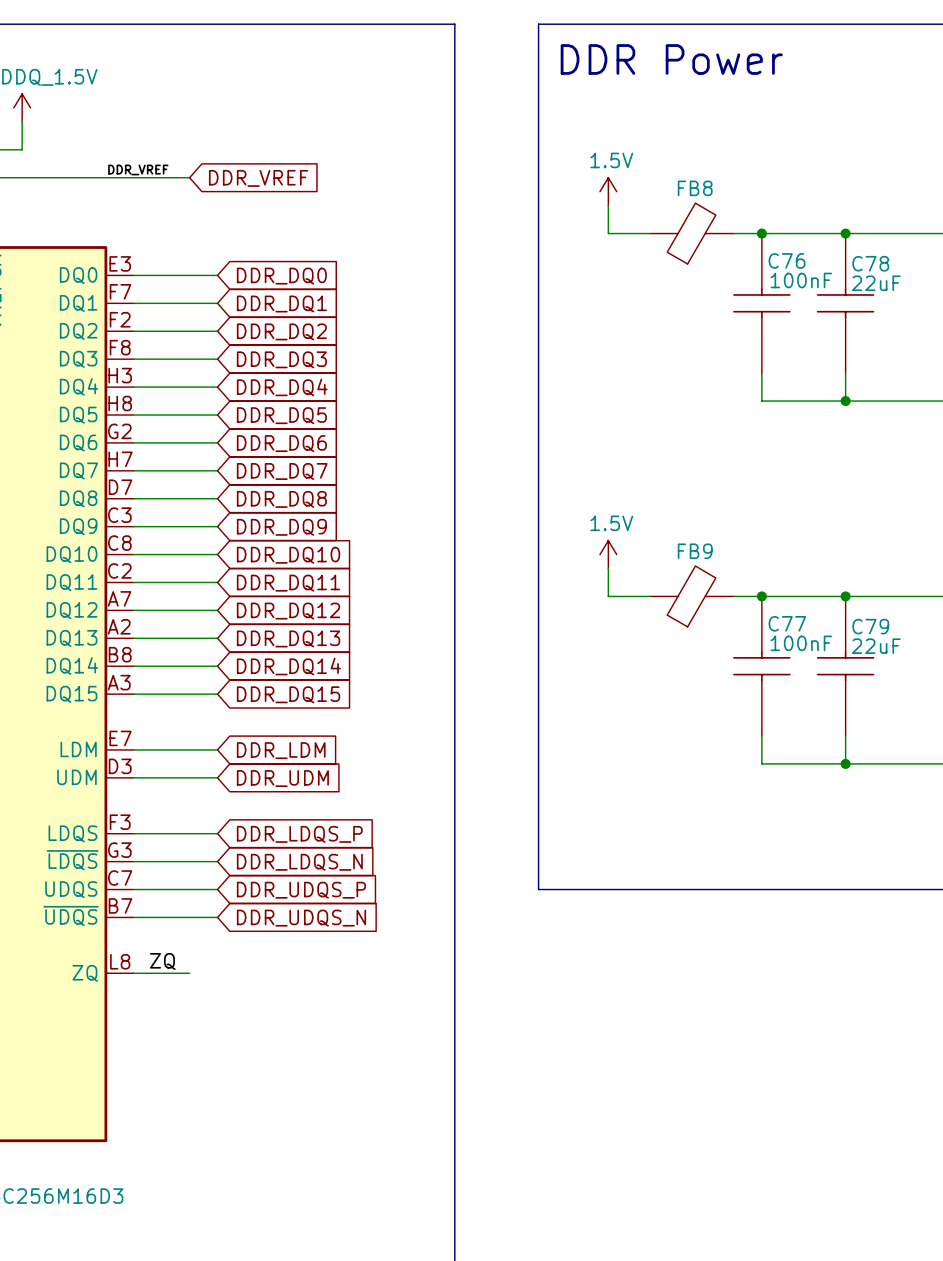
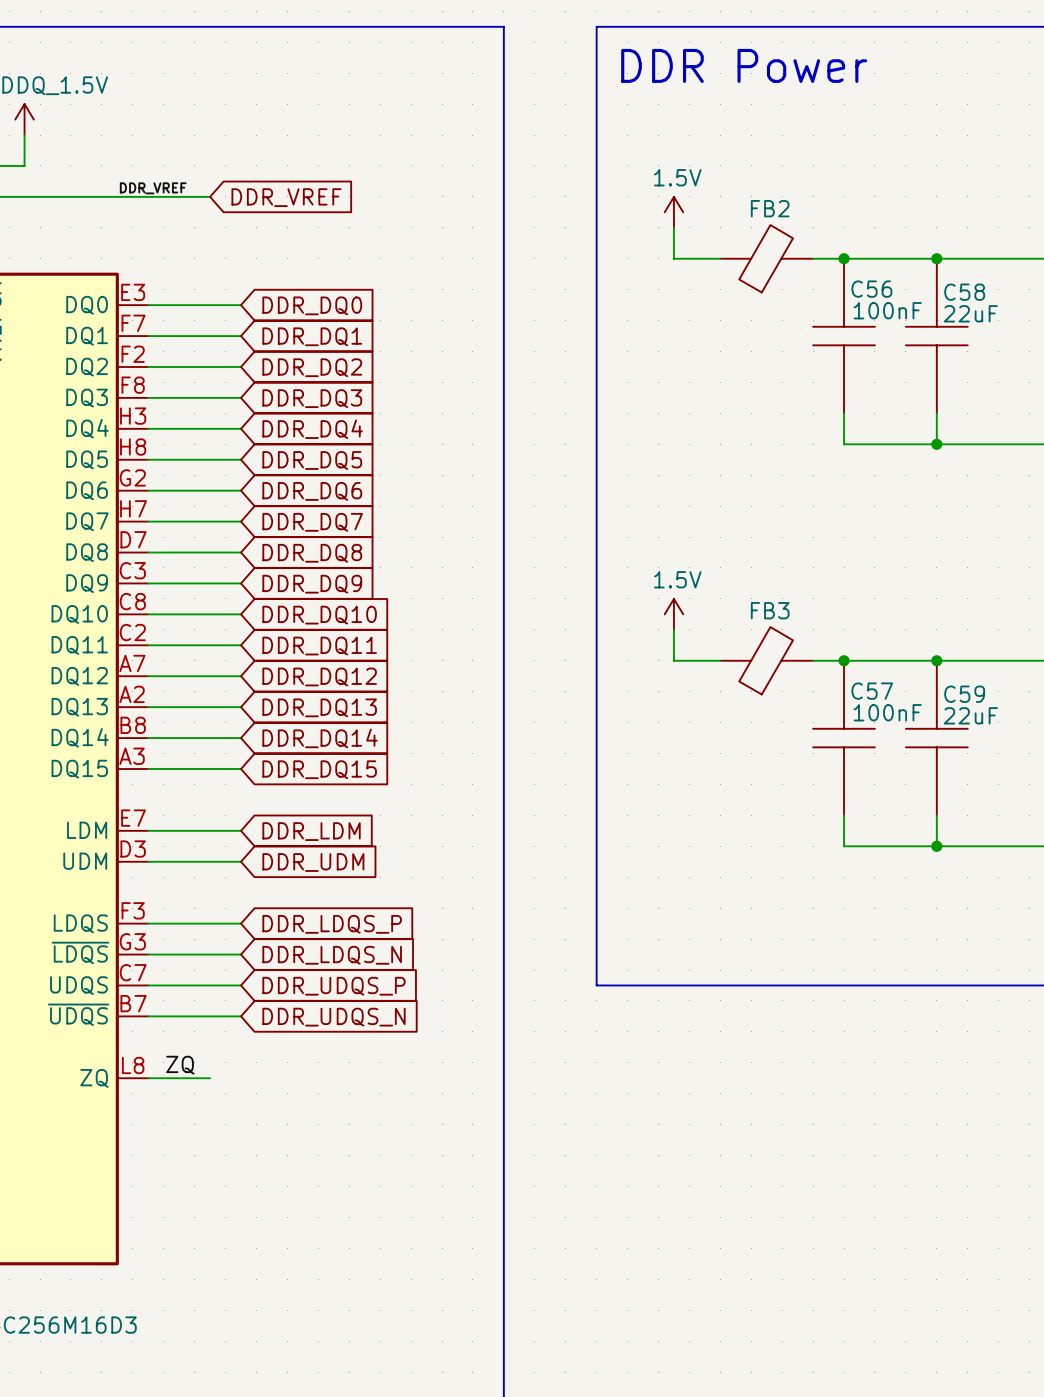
FB8 name: FB8 (695, 188) -> FB2 (770, 208)
C76 name: C76 (787, 260) -> C56 (871, 289)
C78 name: C78 (870, 263) -> C58 (964, 292)
FB9 name: FB9 (695, 551) -> FB3 (770, 610)
C77 name: C77 (787, 623) -> C57 (872, 691)
C79 name: C79 (870, 626) -> C59 (964, 694)

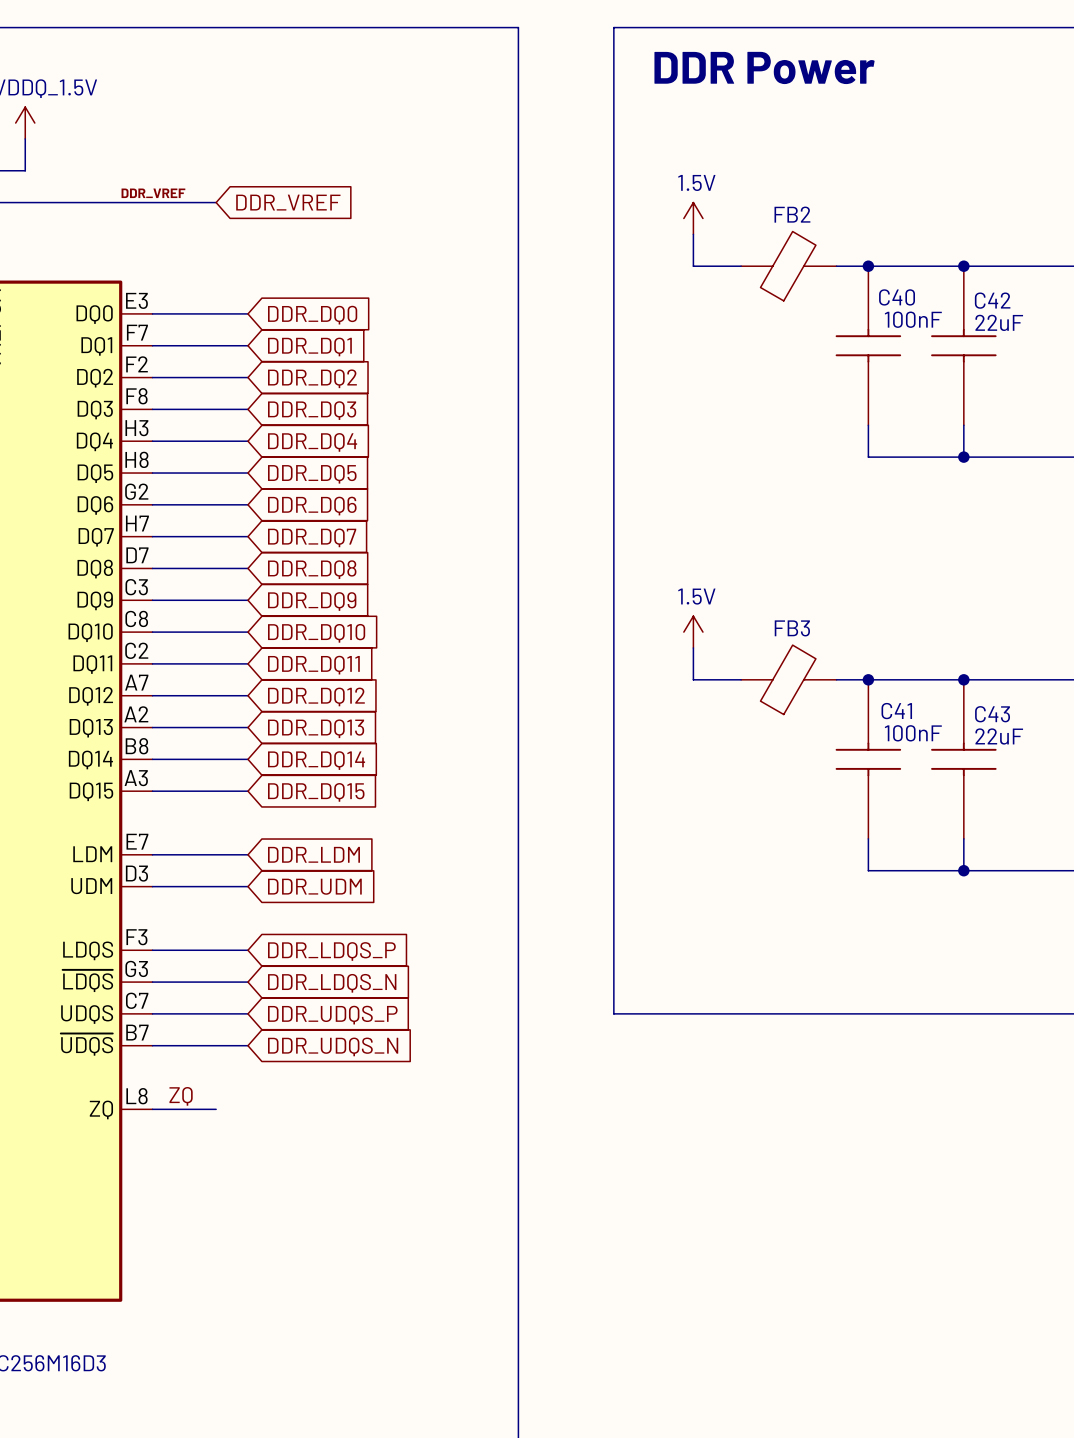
C56 name: C56 (871, 289) -> C40 (897, 297)
C58 name: C58 (964, 292) -> C42 (992, 300)
C57 name: C57 (872, 691) -> C41 (896, 711)
C59 name: C59 (964, 694) -> C43 (992, 714)

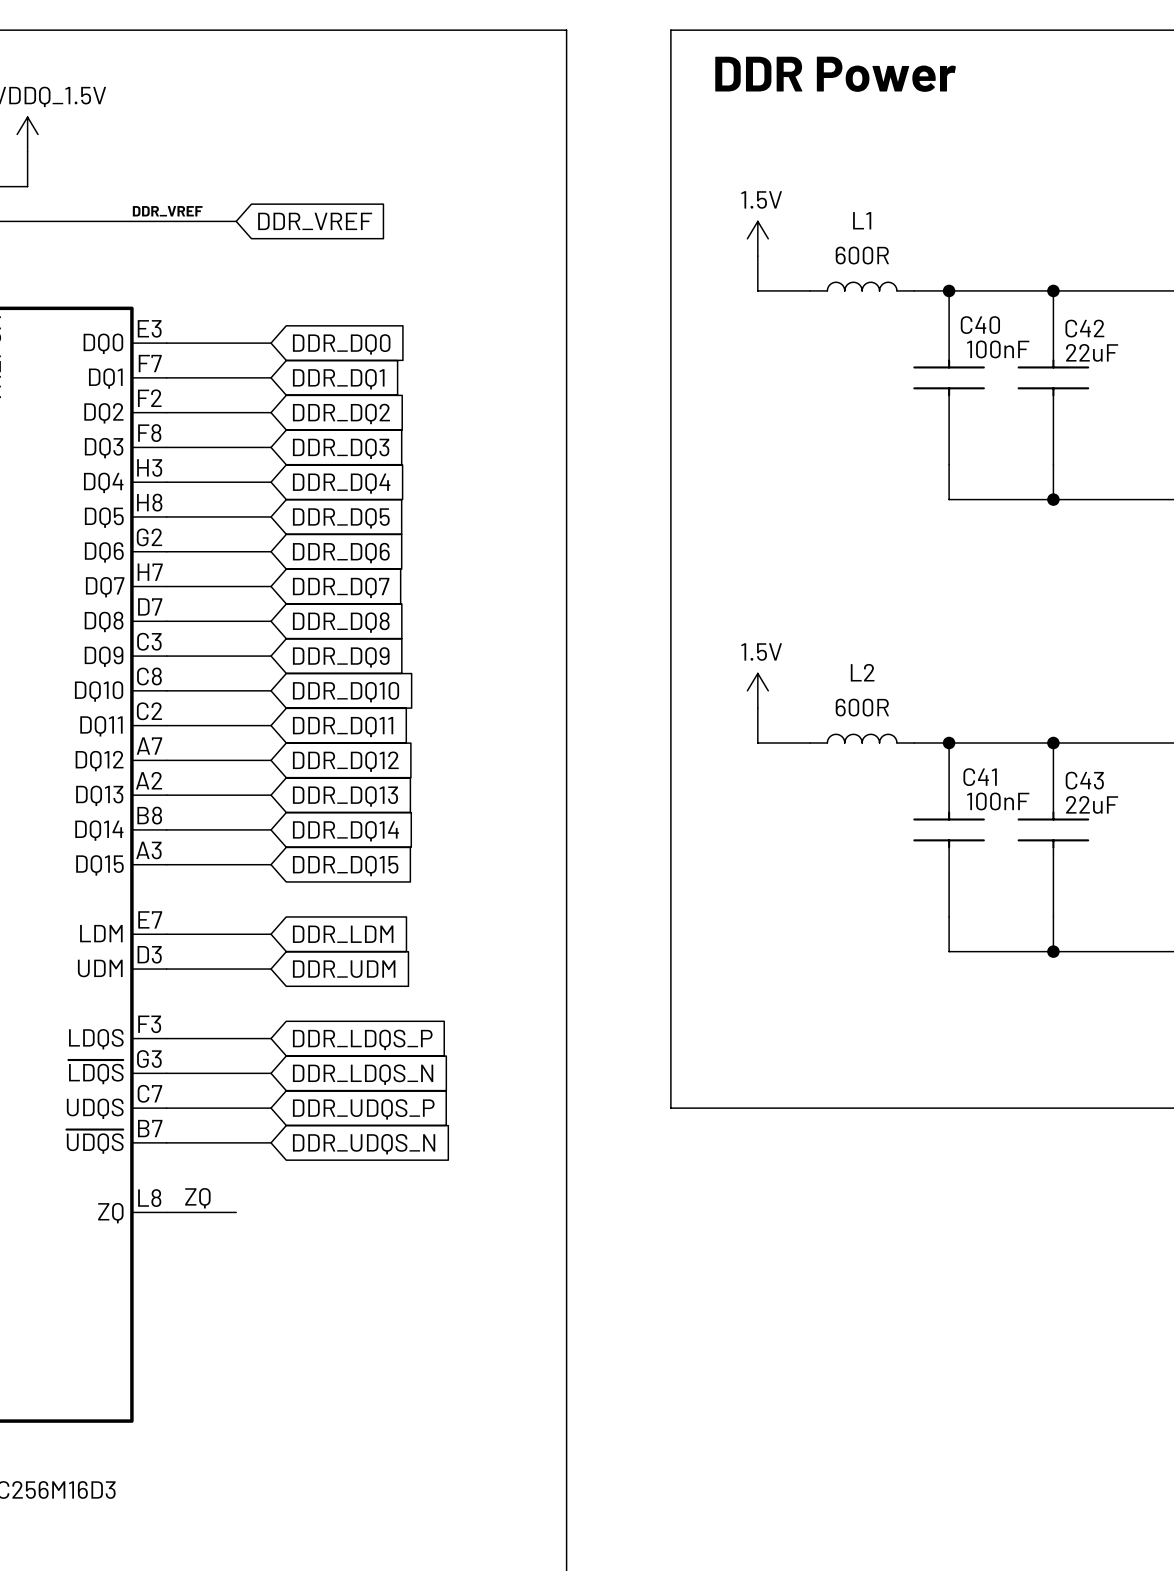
L1: none -> 600R (862, 286)
FB2: (788, 266) -> none
L2: none -> 600R (862, 738)
FB3: (788, 679) -> none

